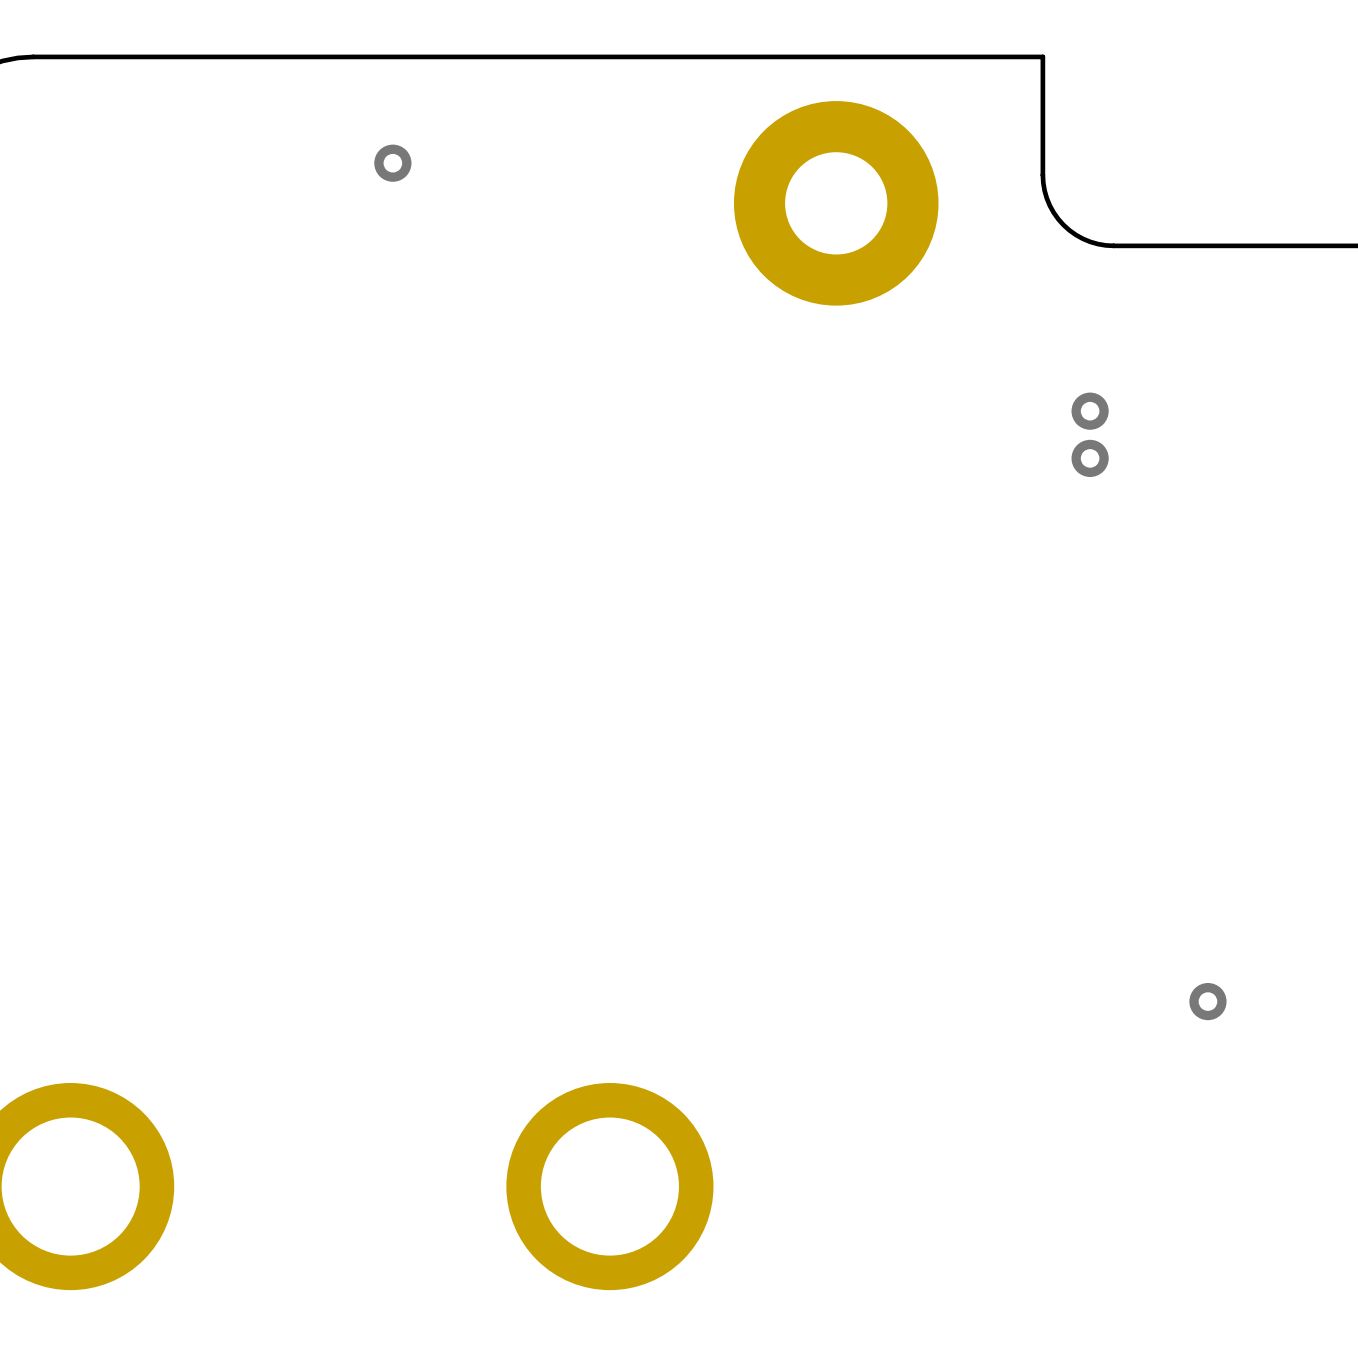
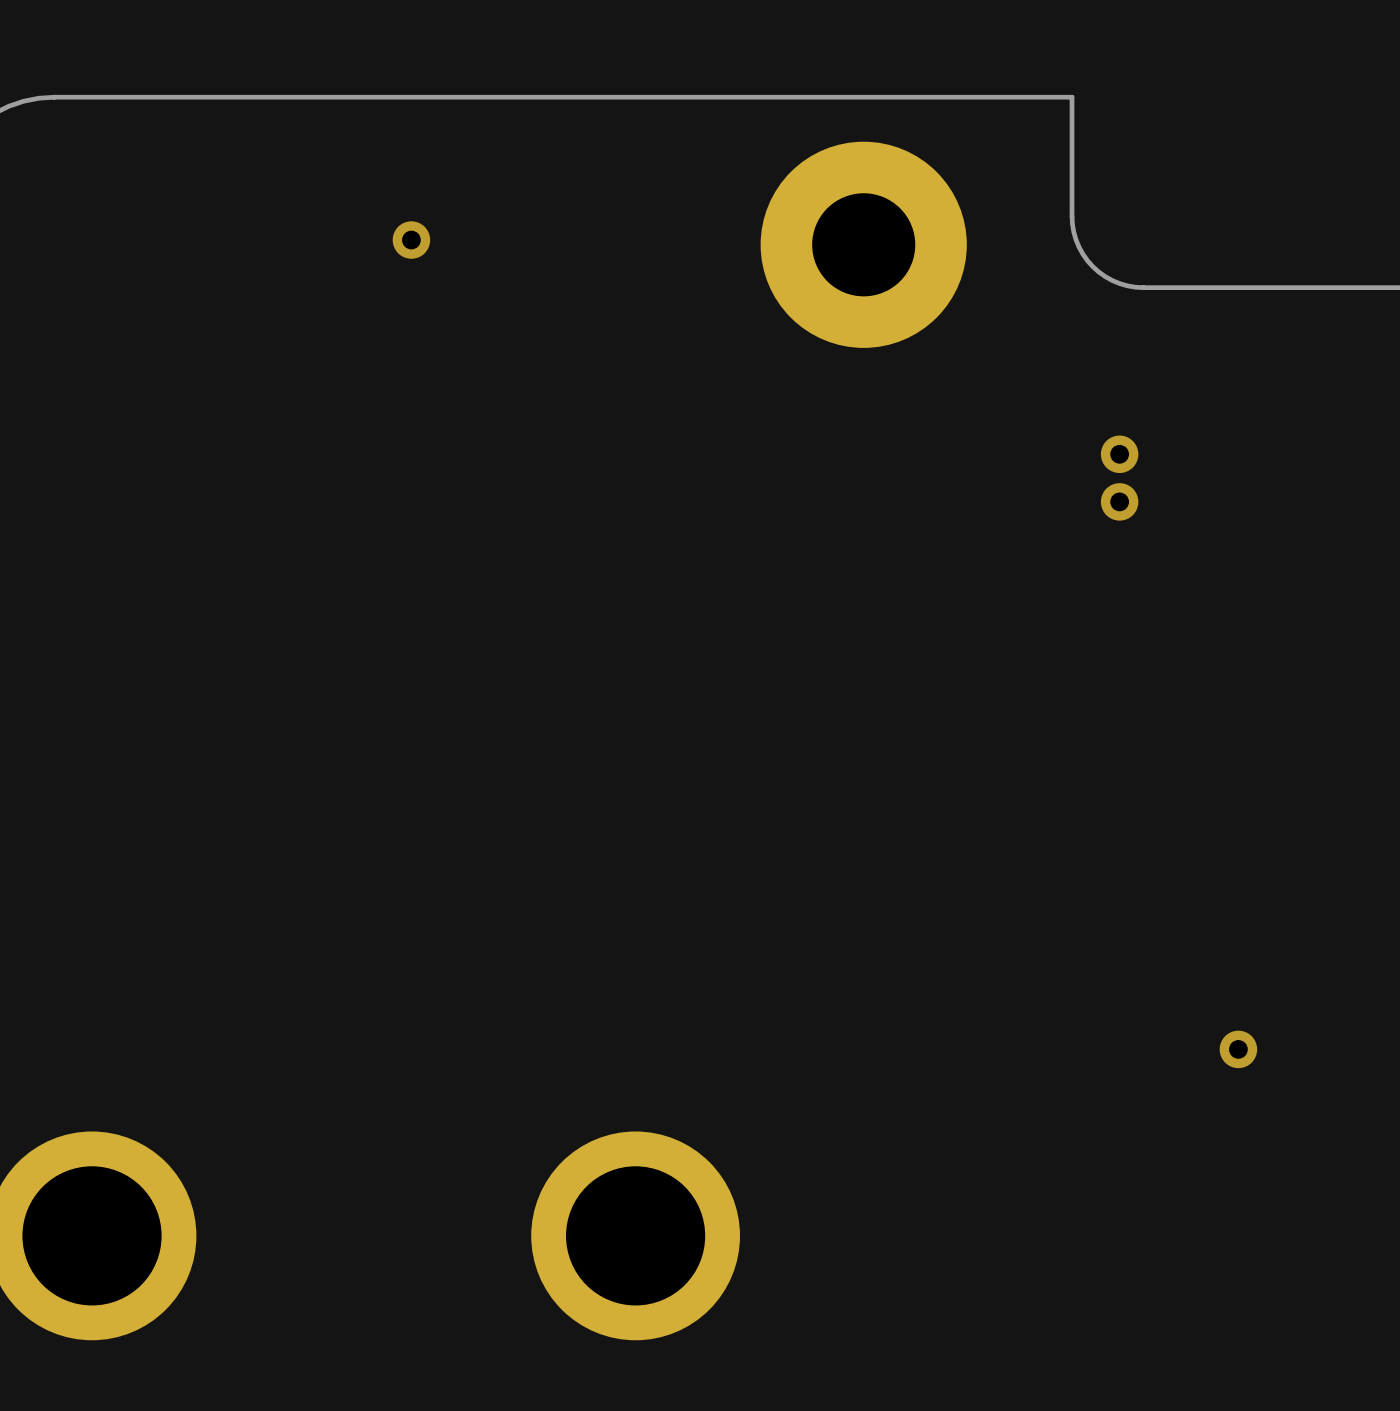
via position: (392, 163) -> (411, 240)

